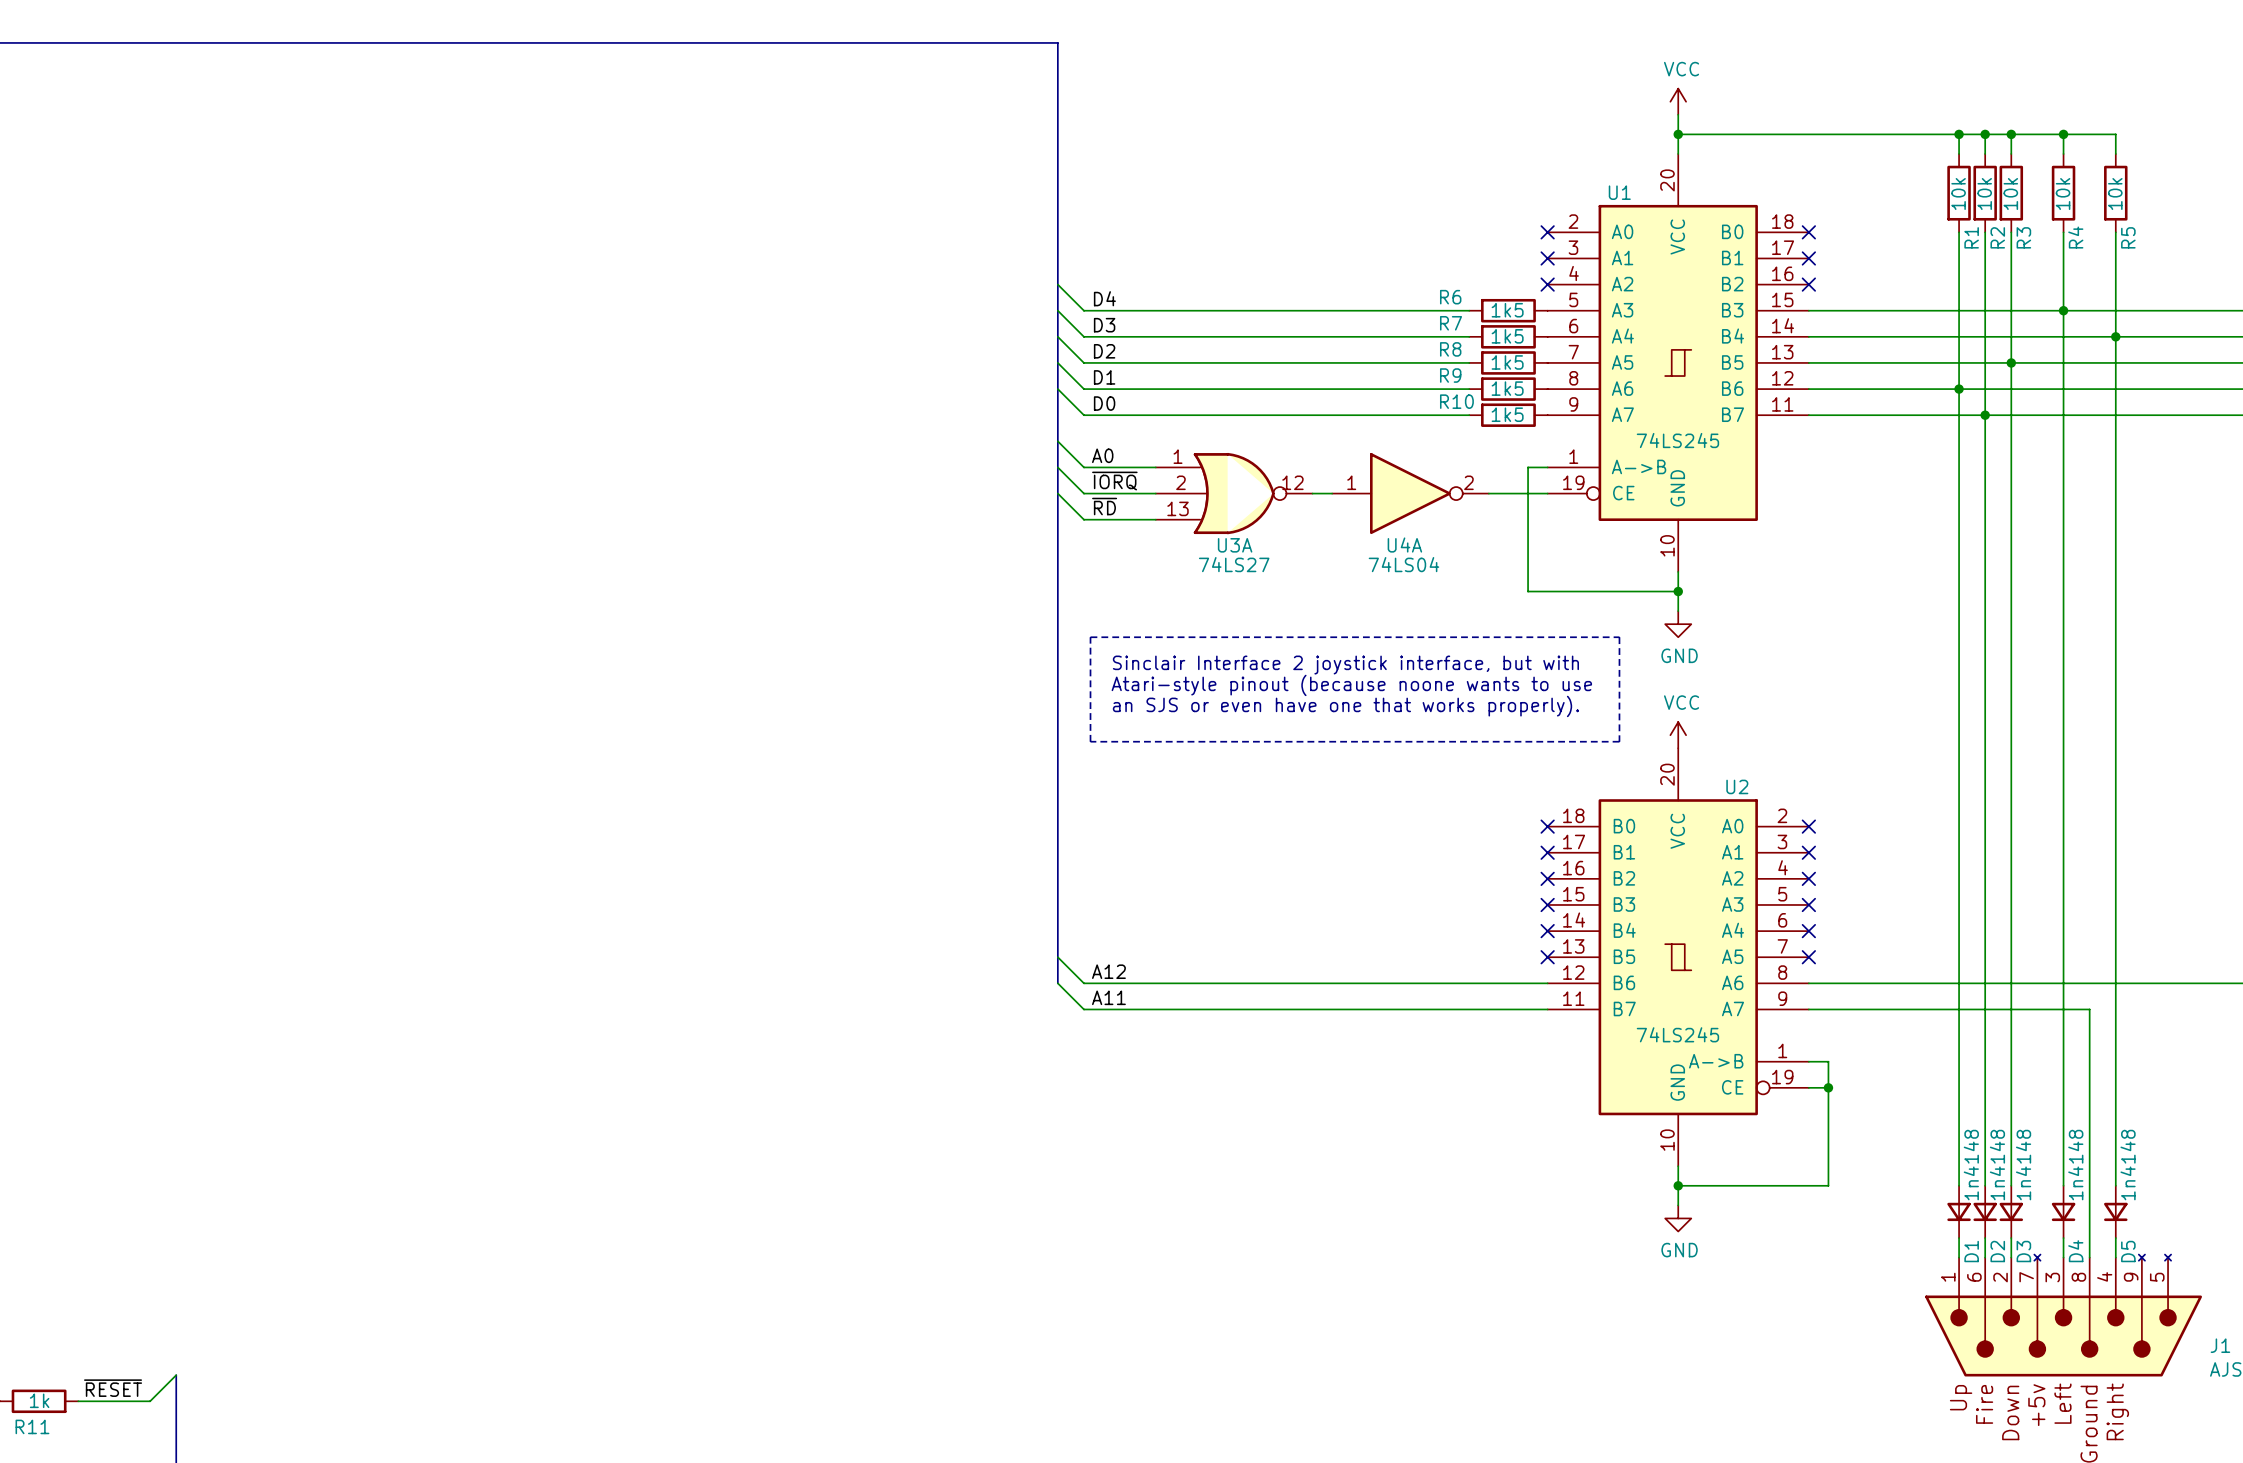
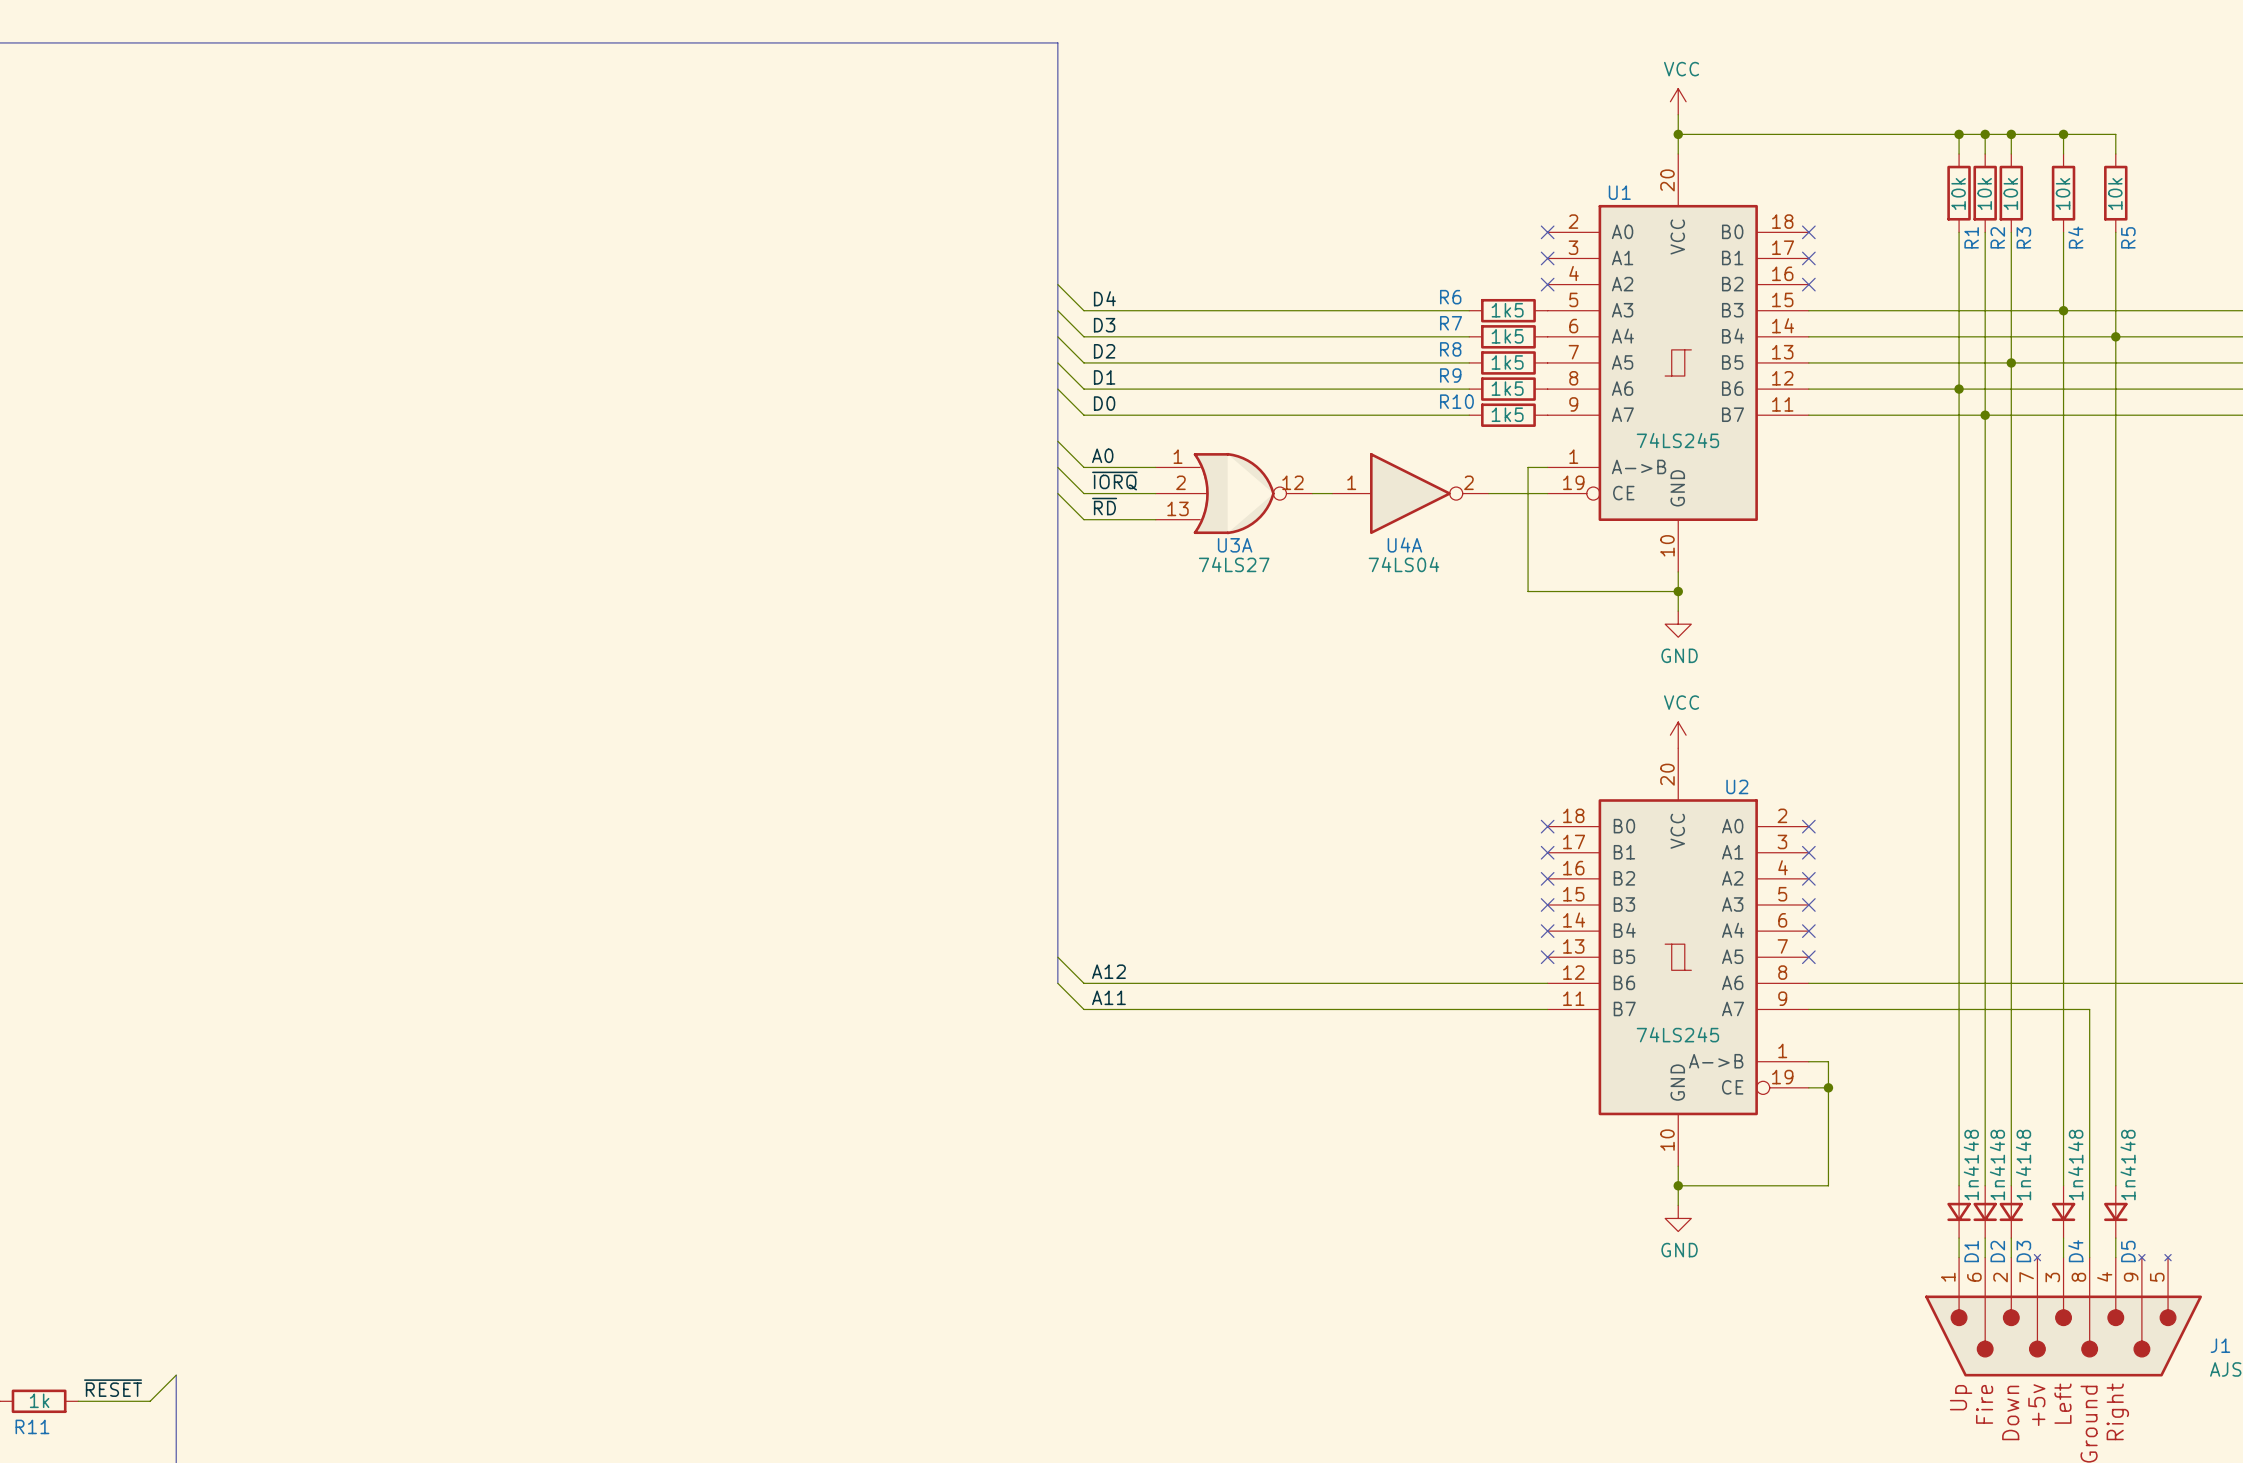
line: (1090, 637) (1619, 637) (1619, 741) (1090, 741) (1090, 637) -> none
text: Sinclair Interface 2 joystick interface, but with (1345, 665) -> none
text: Atari-style pinout (because noone wants to use (1351, 685) -> none
text: an SJS or even have one that works properly). (1345, 706) -> none

